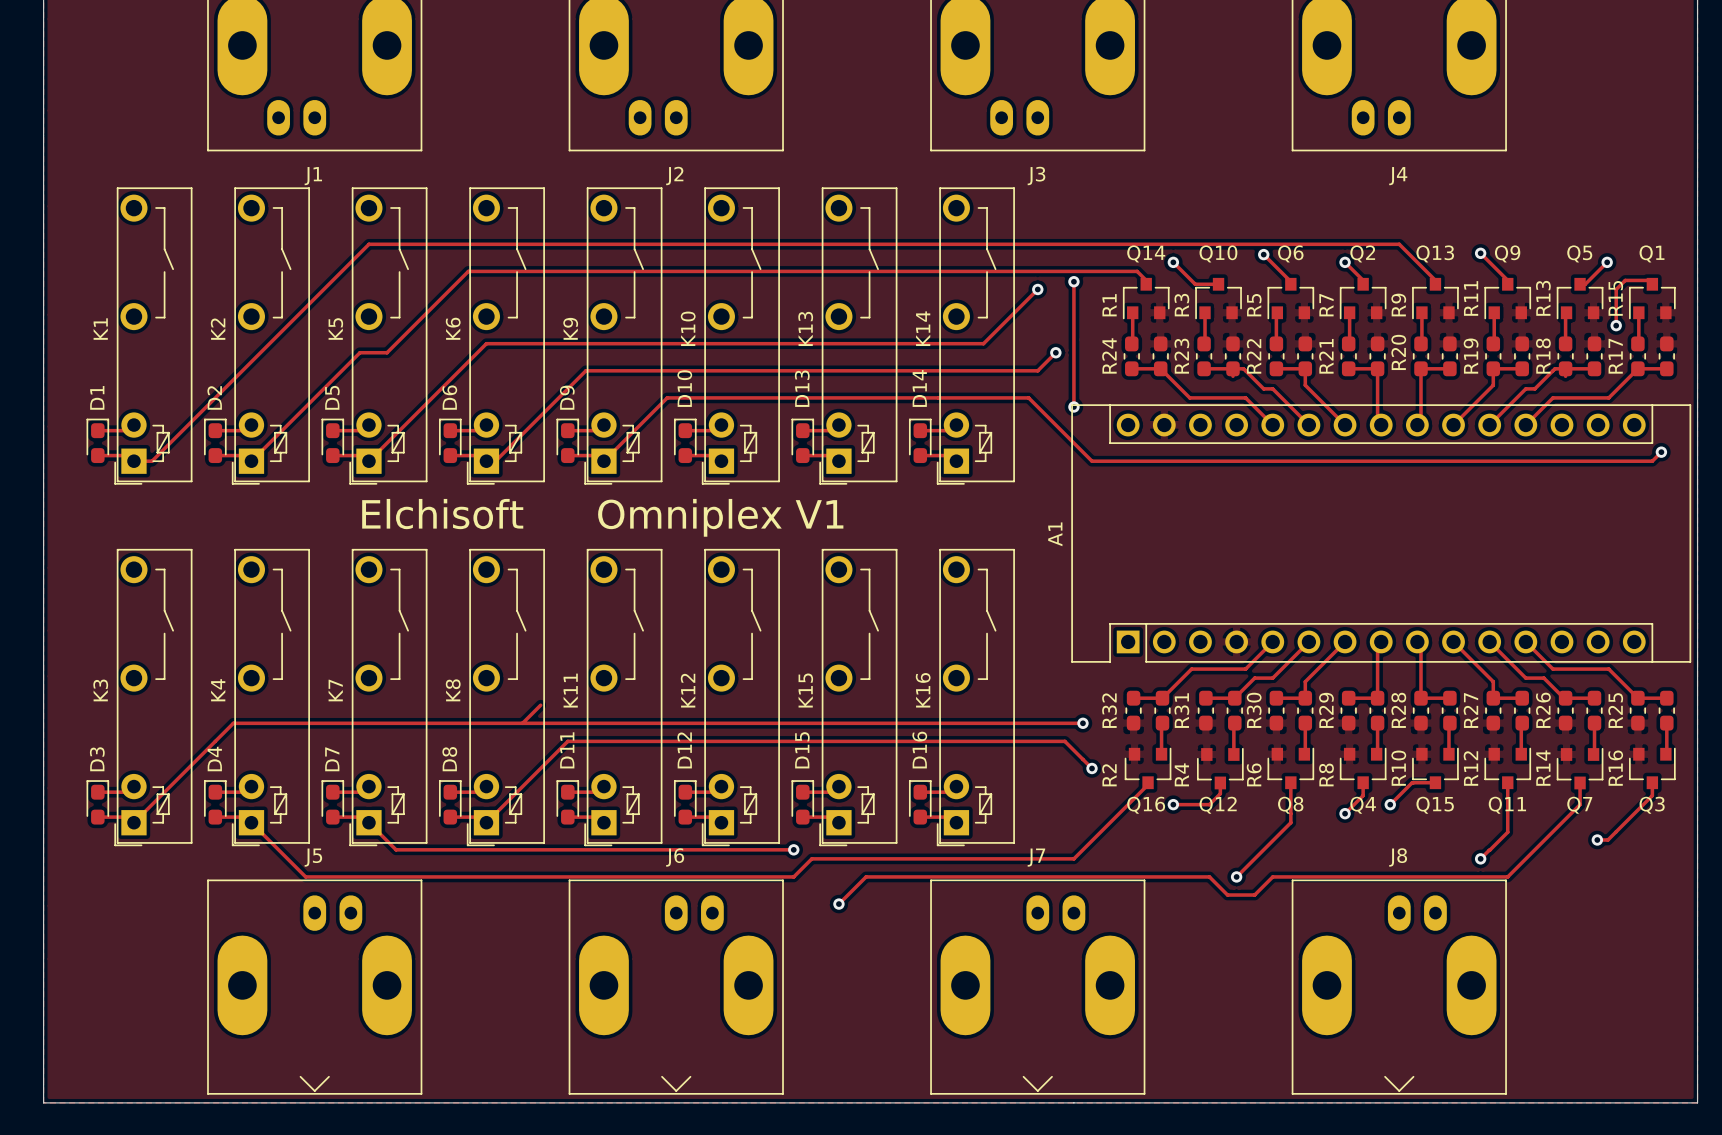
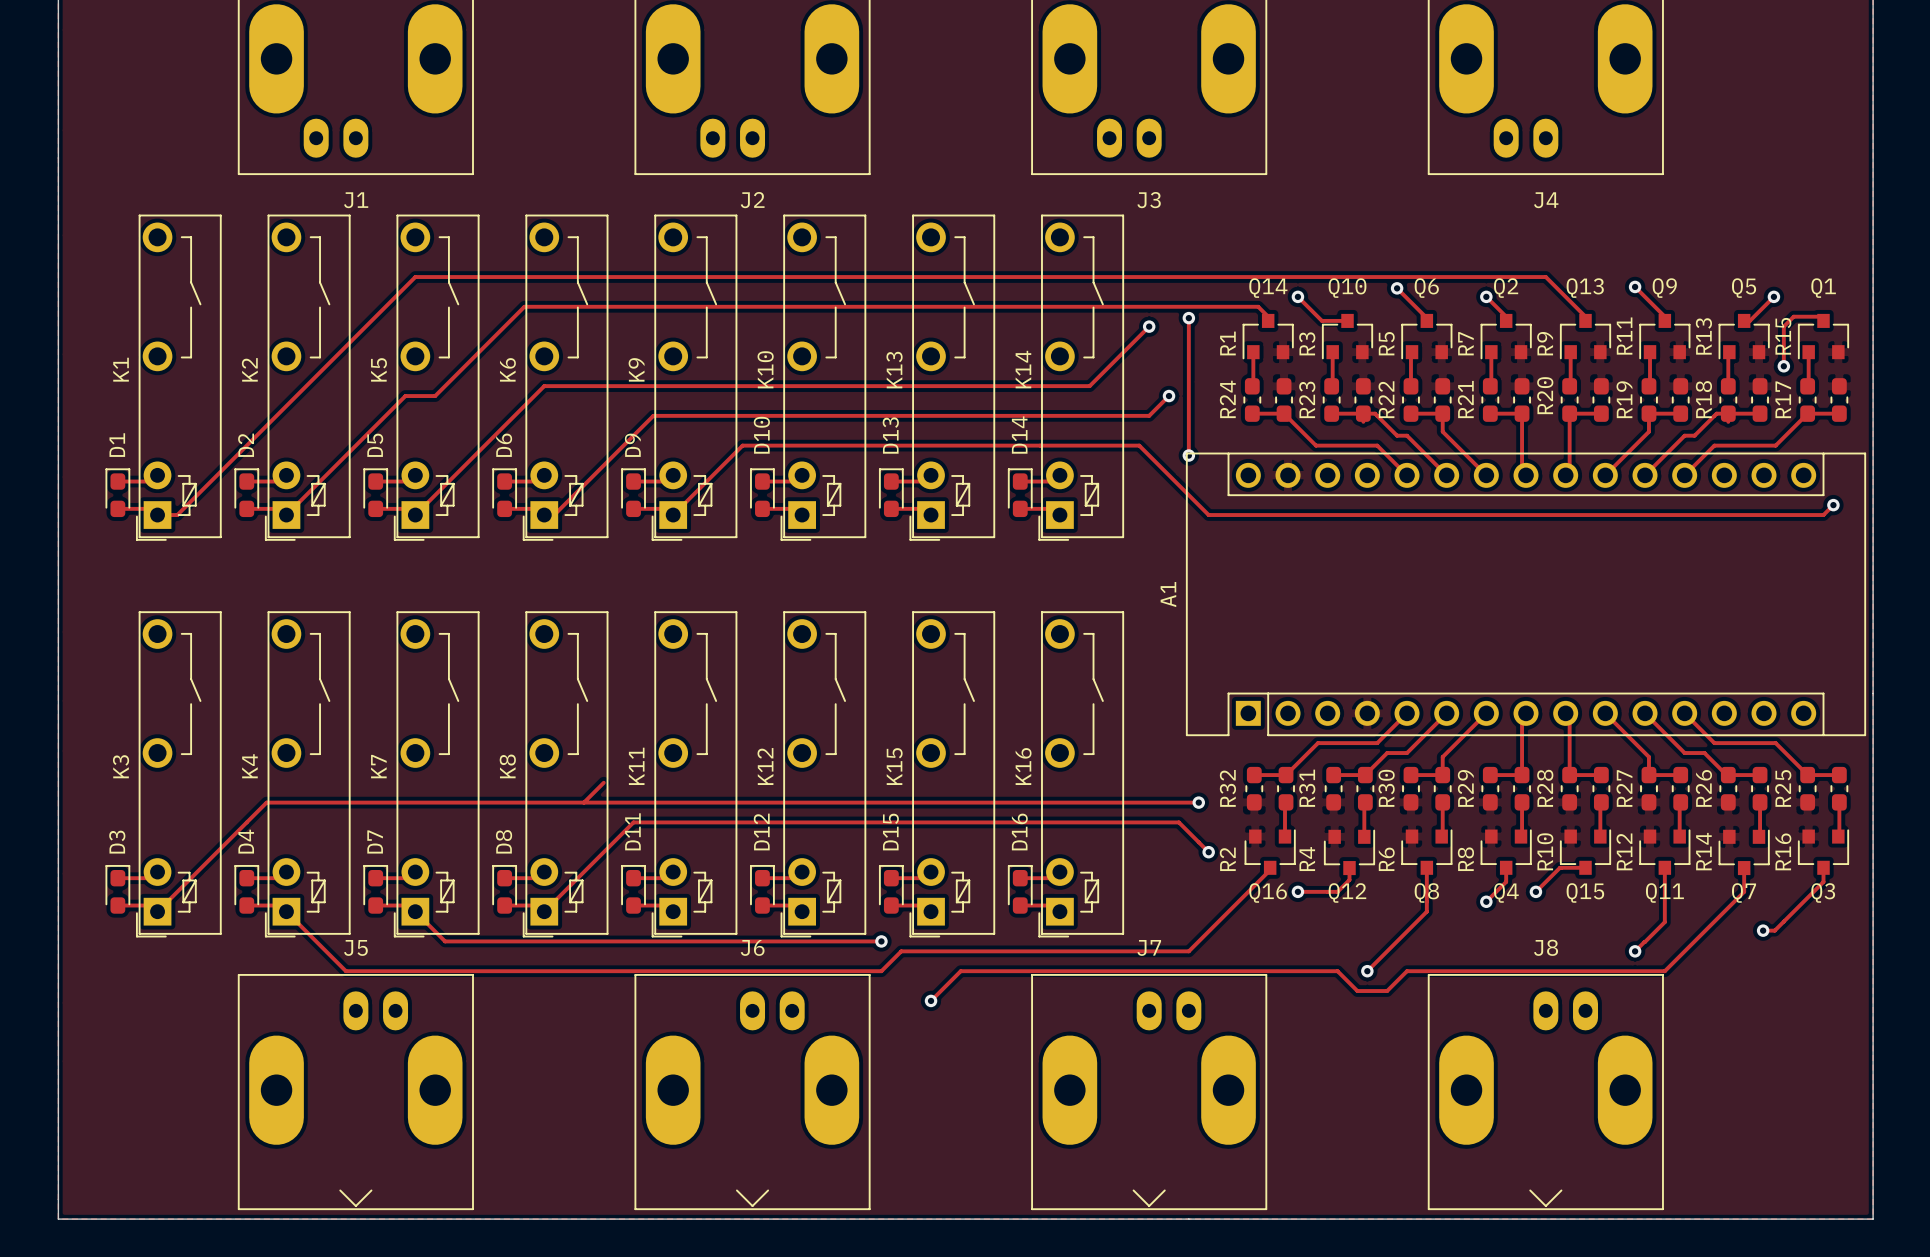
text: Elchisoft (442, 514) -> none
text: Omniplex V1 (720, 517) -> none

